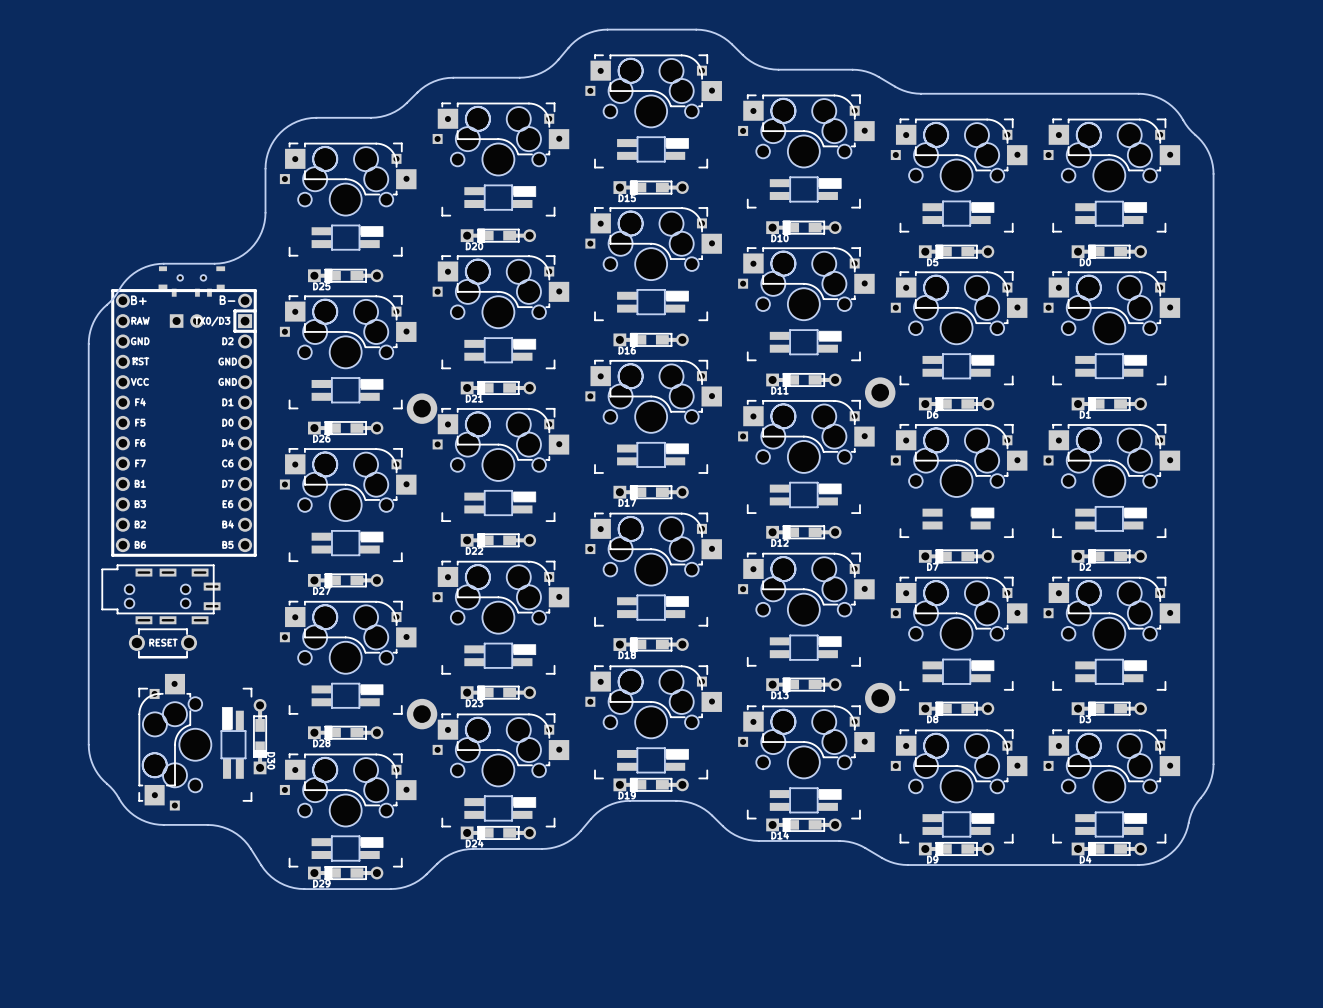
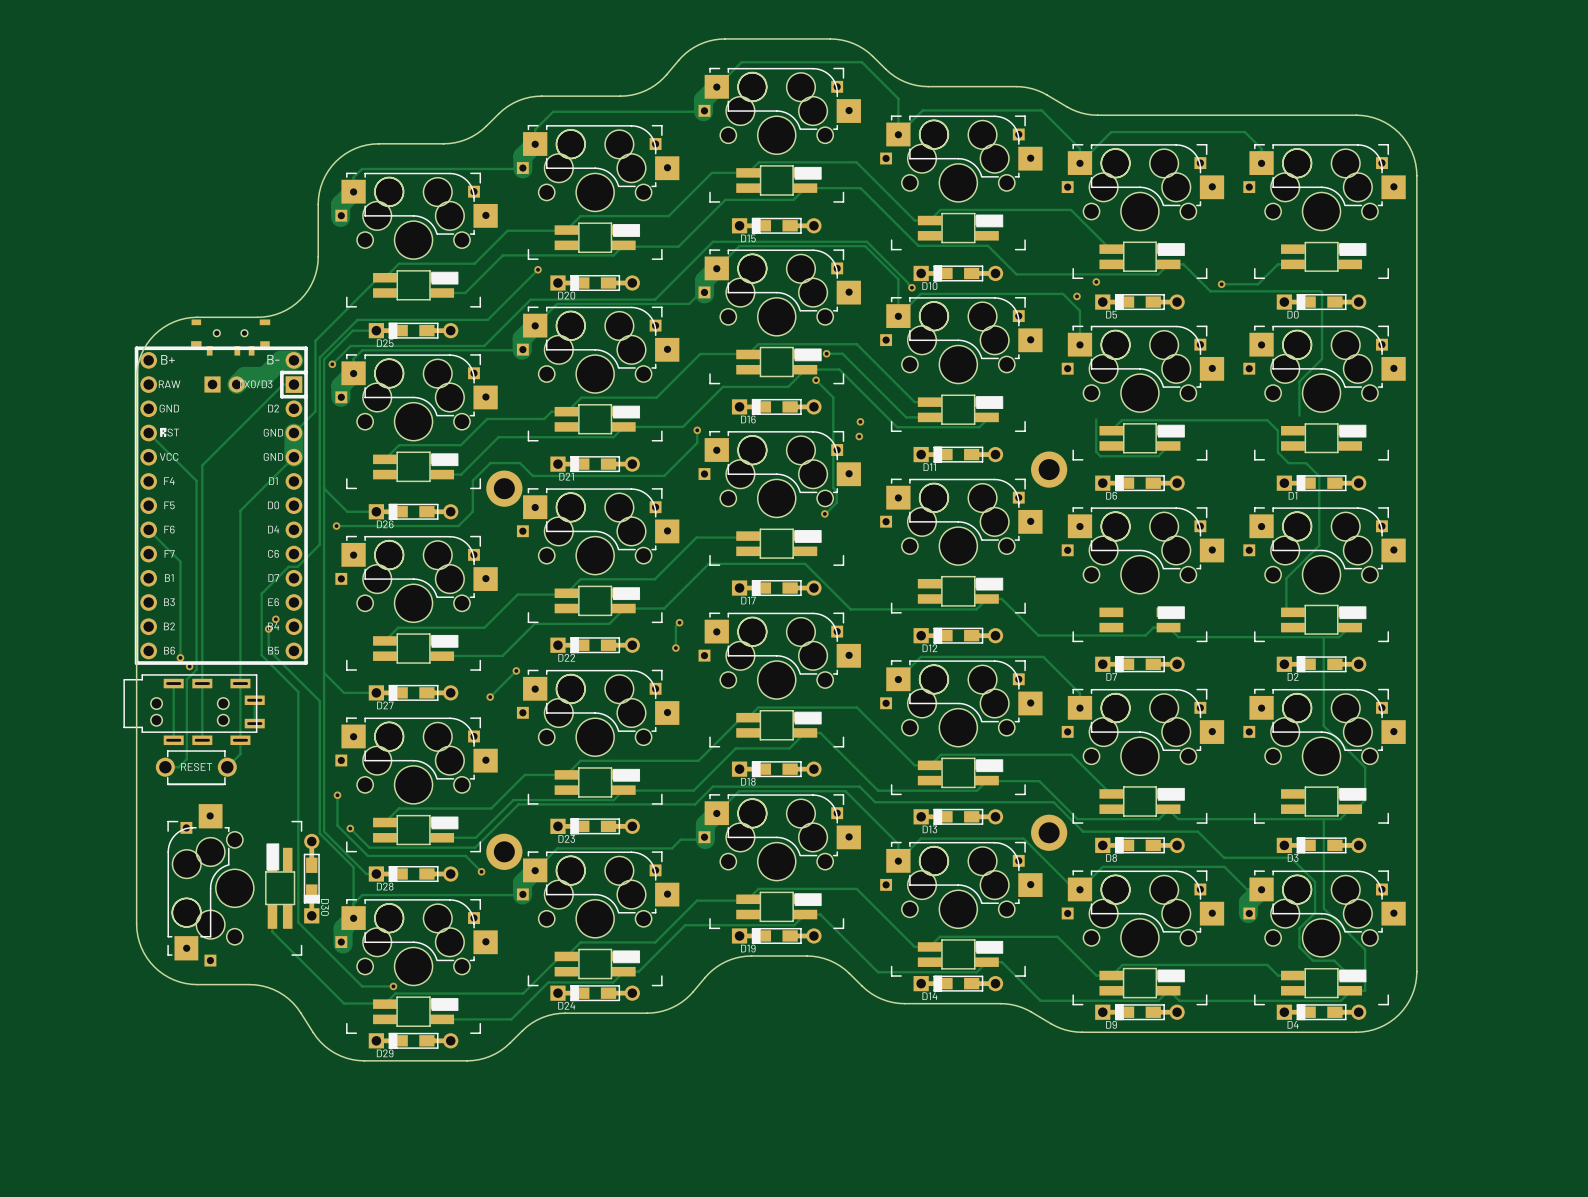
track: none -> (1261, 159) (1261, 163) (1261, 148) (1244, 132) (1111, 132) (1079, 163) (1079, 148) (1041, 110) (922, 110) (898, 134) (898, 98) (861, 62) (741, 62) (703, 100) (703, 111) (553, 111) (535, 129) (535, 144) (522, 156) (522, 168) (362, 168) (353, 177) (353, 191) (340, 204) (340, 217)
track: none -> (805, 188) (860, 188) (918, 245) (987, 245) (1016, 274) (1158, 274) (1167, 265)
track: none -> (805, 188) (793, 199) (725, 199) (678, 246) (623, 245) (613, 255) (502, 255) (465, 293) (439, 293)
board edge: (265, 169) (267, 153) (274, 140) (284, 129) (296, 121) (311, 118) (370, 117) (385, 115) (403, 106) (425, 86) (443, 78) (532, 75) (552, 65) (578, 38) (590, 32) (603, 29) (706, 30) (724, 38) (746, 58) (763, 67) (778, 69) (861, 70) (874, 74) (903, 90) (916, 93) (1138, 93) (1152, 95) (1168, 103) (1204, 144) (1210, 156) (1213, 173) (1213, 768) (1208, 786) (1193, 809) (1181, 841) (1167, 856) (1153, 862) (1143, 864) (903, 864) (890, 861) (861, 845) (848, 841) (758, 840) (744, 838) (726, 829) (704, 809) (686, 801) (625, 801) (612, 803) (600, 810) (574, 837) (555, 847) (473, 848) (458, 851) (440, 860) (418, 880) (400, 888) (304, 889) (289, 886) (271, 876) (244, 840) (227, 829) (212, 825) (154, 824) (133, 815) (97, 773) (91, 762) (88, 749) (89, 335) (97, 314) (133, 273) (154, 264) (219, 263) (234, 259) (246, 252) (256, 241) (263, 227) (265, 212) -> (318, 204) (320, 186) (328, 170) (340, 157) (355, 148) (372, 144) (443, 143) (461, 141) (481, 130) (508, 106) (529, 97) (620, 96) (636, 94) (659, 82) (690, 49) (704, 42) (719, 39) (842, 40) (863, 49) (890, 73) (910, 84) (928, 86) (1027, 87) (1042, 92) (1076, 111) (1092, 114) (1356, 115) (1373, 117) (1389, 125) (1399, 132) (1409, 147) (1415, 163) (1416, 175) (1416, 971) (1414, 989) (1406, 1005) (1394, 1018) (1384, 1025) (1362, 1031) (1076, 1032) (1060, 1028) (1026, 1009) (1011, 1004) (904, 1003) (887, 1001) (866, 990) (840, 966) (818, 957) (746, 956) (730, 959) (716, 966) (685, 999) (662, 1011) (647, 1013) (565, 1013) (547, 1015) (526, 1026) (500, 1050) (478, 1059) (364, 1060) (346, 1058) (325, 1046) (316, 1037) (293, 1003) (273, 989) (255, 984) (191, 984) (179, 981) (163, 974) (150, 962) (143, 952) (137, 935) (136, 924) (137, 366) (143, 349) (150, 339) (163, 327) (174, 321) (191, 317) (263, 317) (280, 312) (291, 307) (304, 295) (311, 285) (317, 268) (318, 255)
track: none -> (929, 220) (940, 209) (1071, 209) (1110, 250)
track: none -> (929, 220) (914, 220) (856, 162) (758, 162) (748, 172) (711, 172) (668, 216) (580, 216) (566, 230)
track: none -> (566, 230) (507, 230) (474, 263) (399, 263) (384, 278) (377, 278) (315, 340) (315, 411) (293, 433) (293, 457) (240, 510) (240, 754) (227, 767)
track: none -> (1167, 265) (1183, 264) (1210, 291) (1322, 292) (1322, 359) (1299, 381) (1299, 415)
track: none -> (1293, 264) (1277, 264) (1258, 284) (1221, 284)
track: none -> (538, 269) (487, 319) (357, 319) (319, 357) (319, 544) (297, 566) (288, 566) (261, 593) (261, 655) (298, 691) (298, 922) (362, 986) (393, 986)
via: none -> (538, 269)
via: none -> (1096, 281)
via: none -> (1221, 284)
track: none -> (911, 287) (866, 241) (712, 241) (655, 299) (530, 299) (484, 345) (350, 345) (332, 364)
via: none -> (911, 287)
via: none -> (1077, 296)
track: none -> (400, 330) (352, 330) (324, 359) (324, 831) (366, 874) (400, 874)
track: none -> (1079, 344) (1079, 310) (1063, 293) (920, 293) (898, 316) (898, 279) (865, 246) (739, 246) (704, 280) (704, 293) (699, 293) (689, 303) (557, 303) (522, 338) (522, 350) (362, 350) (353, 358) (353, 373) (340, 385) (340, 397)
track: none -> (826, 353) (842, 353) (906, 417) (932, 417)
via: none -> (826, 353)
track: none -> (293, 360) (280, 360) (264, 376) (244, 376) (236, 384)
via: none -> (332, 364)
track: none -> (816, 380) (833, 397) (833, 487) (836, 491) (836, 502) (824, 513)
via: none -> (816, 380)
track: none -> (293, 384) (283, 384) (202, 465) (202, 740)
track: none -> (930, 402) (914, 402) (856, 344) (758, 344) (748, 354) (700, 353) (656, 397) (581, 397) (567, 411) (551, 411) (544, 418) (487, 418) (460, 445) (399, 445) (384, 459)
track: none -> (986, 417) (979, 427) (897, 427) (839, 369) (805, 369) (788, 386) (723, 386) (682, 426) (623, 426)
track: none -> (1096, 419) (1096, 452) (1100, 456) (1158, 456) (1168, 446)
via: none -> (860, 421)
track: none -> (623, 427) (613, 437) (498, 437) (461, 474) (441, 475)
track: none -> (697, 430) (697, 442) (664, 475) (532, 475) (519, 463) (490, 463) (472, 480) (472, 511) (458, 526) (336, 526)
via: none -> (697, 430)
track: none -> (148, 433) (196, 480) (196, 669) (186, 679) (186, 759) (178, 767) (165, 767)
track: none -> (1111, 432) (1121, 420) (1267, 420) (1277, 430) (1277, 452) (1288, 463) (1306, 463) (1319, 476) (1319, 545) (1286, 578) (1286, 608) (1290, 612)
via: none -> (859, 436)
track: none -> (324, 488) (347, 511) (400, 511)
via: none -> (824, 513)
via: none -> (336, 526)
track: none -> (148, 529) (180, 561) (180, 657)
track: none -> (748, 536) (696, 537) (654, 579) (580, 579) (566, 594) (517, 594) (484, 627) (398, 627) (384, 641)
track: none -> (623, 608) (609, 623) (534, 623) (502, 655) (442, 656)
track: none -> (623, 608) (664, 608) (708, 563) (805, 563) (850, 609) (976, 609) (986, 598) (1001, 598) (1038, 635) (1145, 635) (1153, 627) (1168, 627) (1178, 637) (1339, 637) (1350, 627)
via: none -> (275, 619)
track: none -> (679, 622) (675, 626) (675, 648)
via: none -> (679, 622)
track: none -> (268, 629) (268, 649) (319, 701) (319, 833) (353, 867) (353, 918) (343, 928) (343, 944)
via: none -> (268, 629)
track: none -> (1323, 637) (1323, 725) (1365, 767) (1365, 800) (1355, 809) (1350, 809) (1340, 819) (1178, 819) (1168, 809)
via: none -> (675, 648)
via: none -> (180, 657)
via: none -> (189, 666)
track: none -> (516, 670) (490, 697)
via: none -> (516, 670)
track: none -> (324, 672) (344, 692) (400, 692)
track: none -> (898, 679) (920, 656) (1043, 656) (1079, 693) (1079, 707)
track: none -> (173, 683) (173, 740)
via: none -> (490, 697)
track: none -> (254, 700) (254, 723)
track: none -> (930, 765) (941, 754) (1071, 754) (1111, 794)
track: none -> (930, 765) (914, 765) (856, 707) (758, 707) (748, 718) (741, 718) (698, 760) (580, 760) (566, 774) (524, 774) (491, 808) (398, 808) (383, 822)
track: none -> (986, 781) (1039, 781) (1077, 819) (1159, 819) (1168, 809)
track: none -> (986, 781) (977, 790) (878, 790) (820, 732) (805, 732) (789, 748) (735, 748) (693, 790) (623, 790) (613, 800) (513, 800) (475, 837) (442, 838)
track: none -> (337, 795) (337, 825) (367, 855) (465, 855) (481, 871)
via: none -> (337, 795)
track: none -> (1323, 819) (1323, 908) (1365, 949) (1365, 990) (1350, 990) (1340, 1000) (1179, 1000) (1168, 990)
track: none -> (350, 828) (369, 847) (475, 847) (518, 804) (695, 804) (712, 786) (859, 786) (875, 802) (1053, 802) (1083, 831) (1197, 831) (1224, 857) (1290, 857) (1315, 881) (1315, 912) (1299, 928) (1299, 947) (1312, 960) (1334, 960) (1349, 975)
via: none -> (350, 828)
via: none -> (481, 871)
track: none -> (353, 903) (362, 895) (522, 895) (522, 883) (557, 848) (672, 848) (680, 839) (705, 839) (705, 824) (738, 791) (845, 791) (898, 844) (898, 860) (920, 838) (1023, 838) (1074, 889) (1080, 889) (1102, 866) (1224, 866) (1247, 889) (1261, 889) (1248, 902) (1248, 913)
track: none -> (272, 916) (272, 931) (344, 1003) (384, 1004) (395, 993) (523, 993) (559, 957) (565, 957) (580, 942) (655, 942) (697, 900) (747, 900) (758, 888) (856, 888) (914, 946) (929, 946)
track: none -> (929, 946) (939, 936) (1057, 936) (1096, 975) (1111, 975)
track: none -> (623, 971) (638, 971) (685, 925) (794, 925) (804, 914) (820, 914) (878, 972) (976, 972) (986, 962) (1001, 962) (1040, 1000) (1158, 1000) (1168, 990)
track: none -> (623, 971) (613, 982) (548, 982) (511, 1019) (442, 1019)
track: none -> (1293, 975) (1277, 975) (1267, 964) (1122, 964) (1111, 975)
via: none -> (393, 986)

